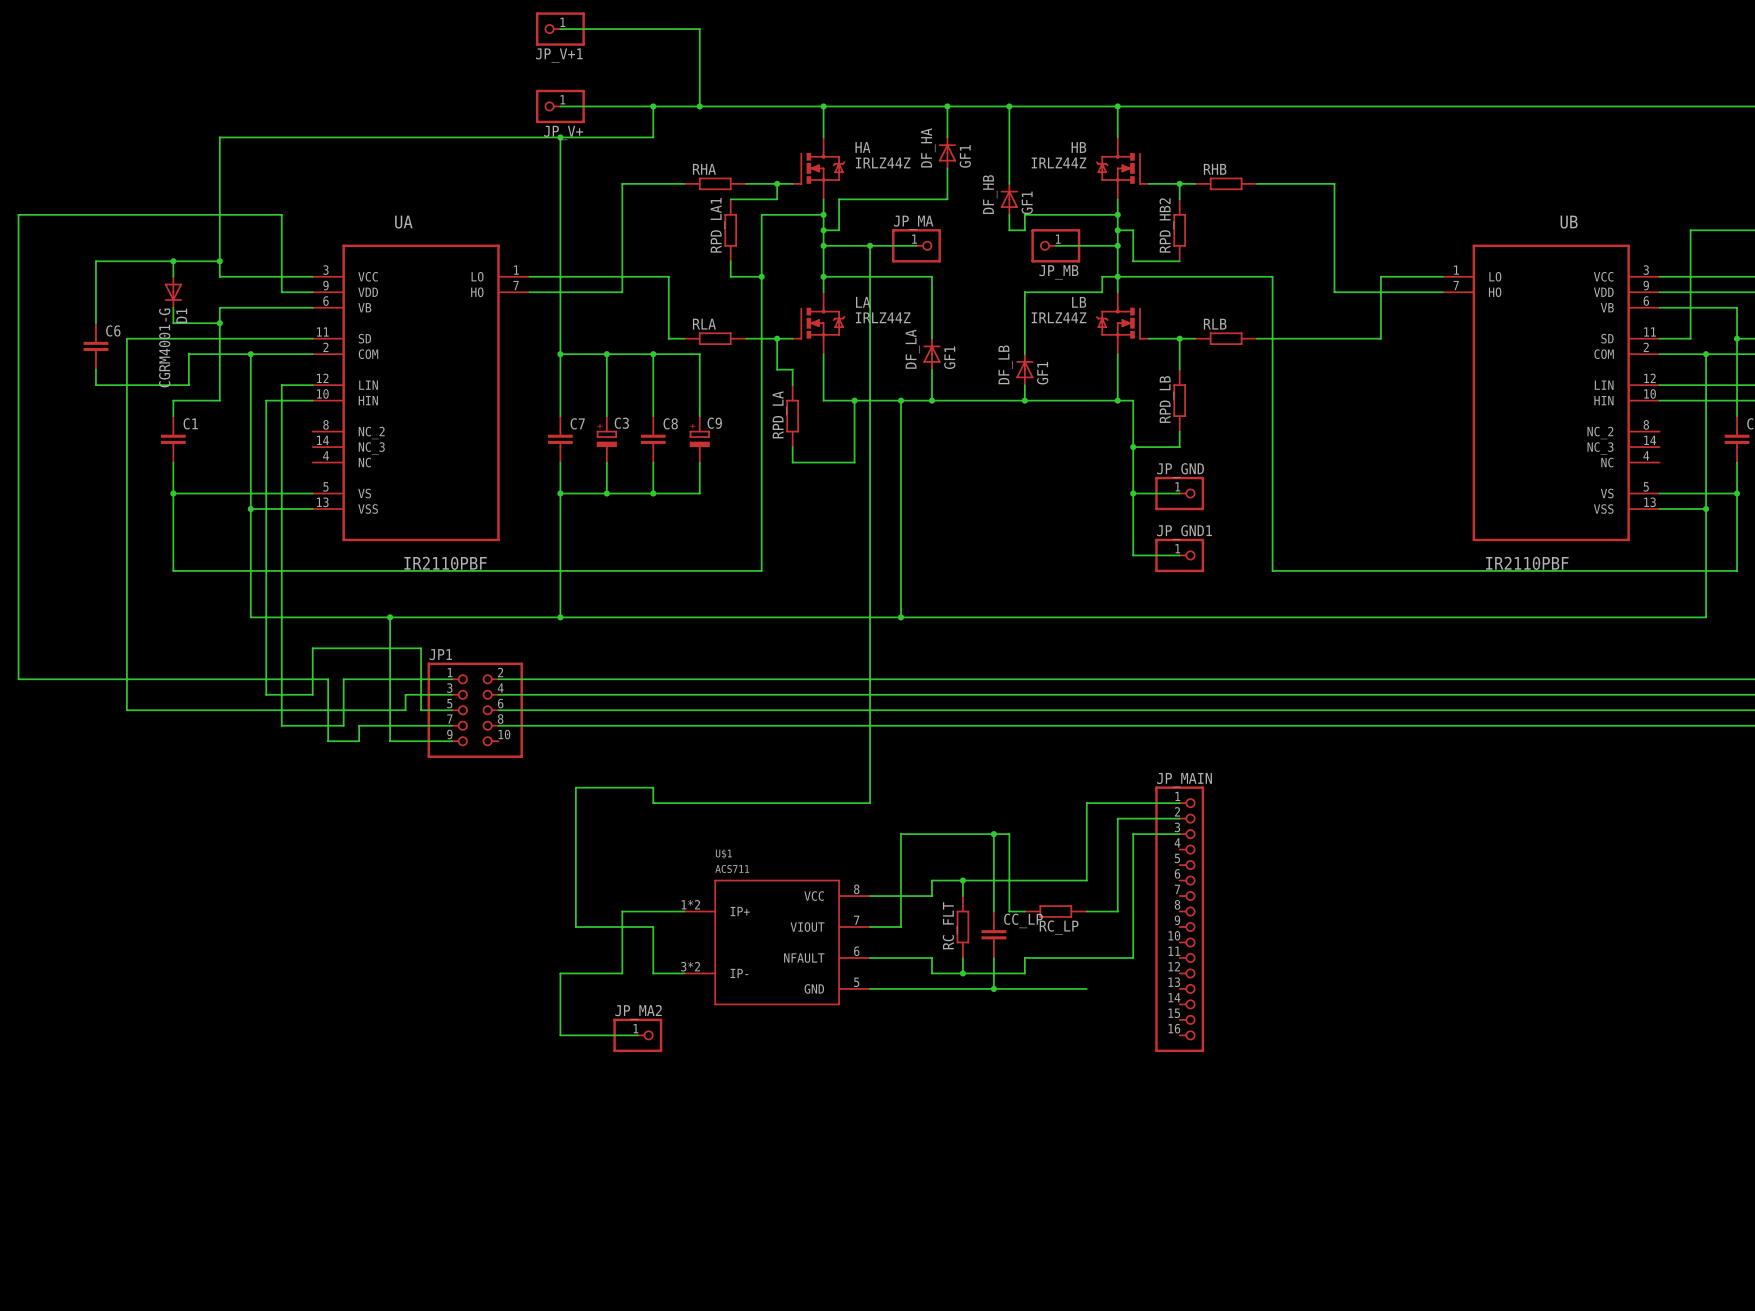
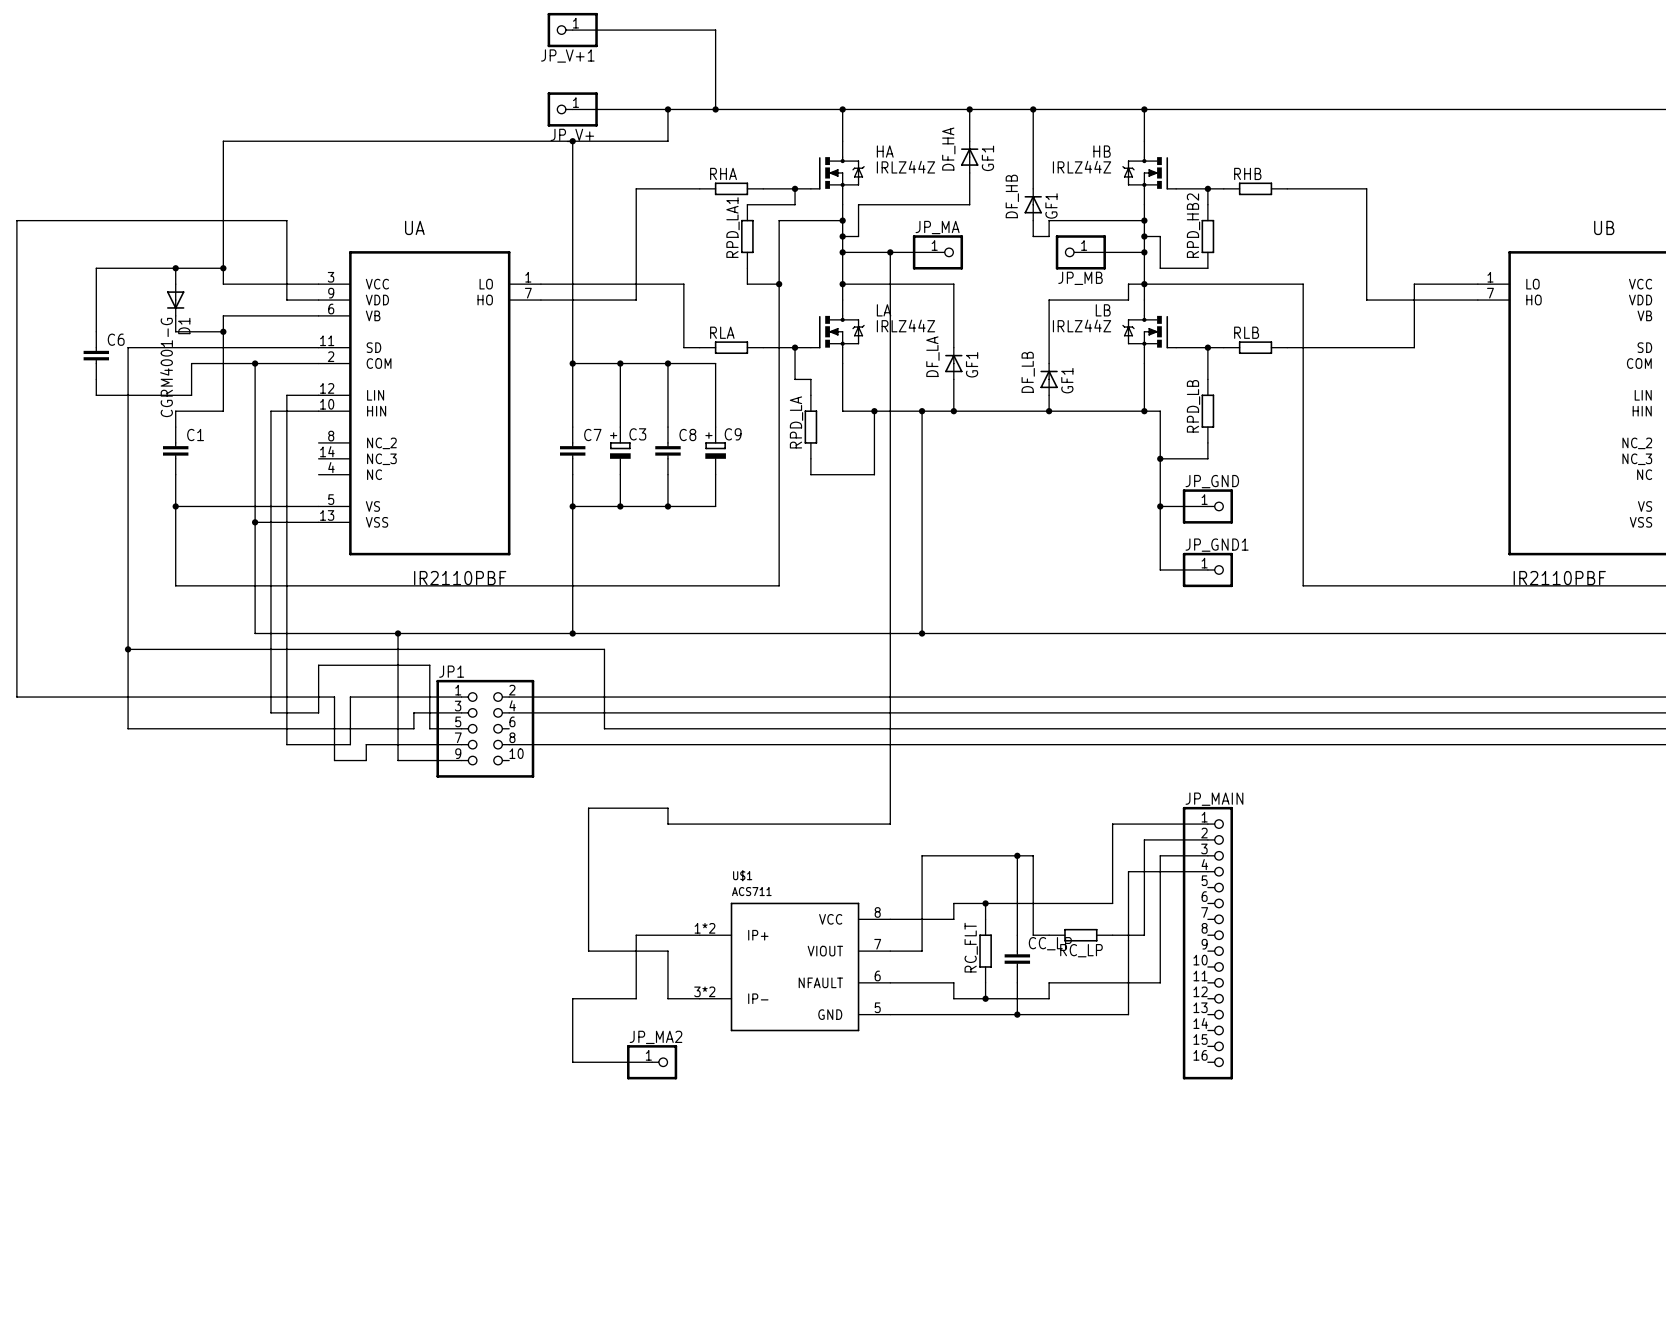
junction: none -> (128, 649)
wire: (498, 710) (591, 710) -> (128, 649) (604, 649) (604, 728)
wire: none -> (1207, 871) (1128, 871) (1128, 1014) (1112, 1014)

